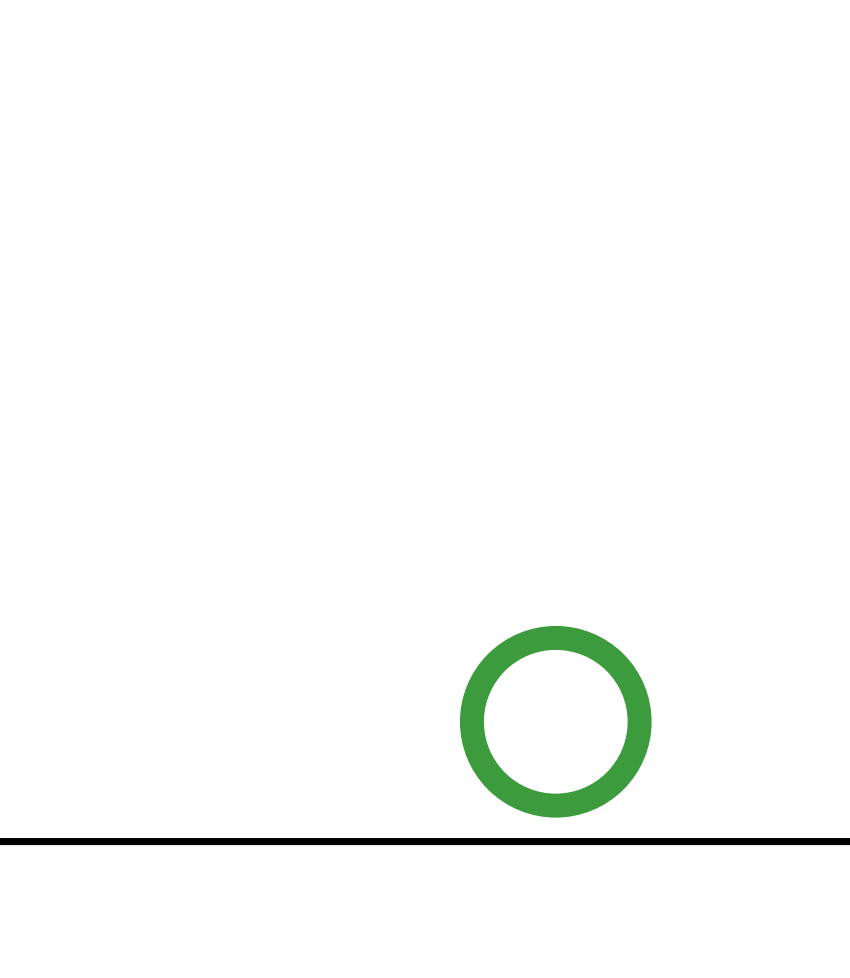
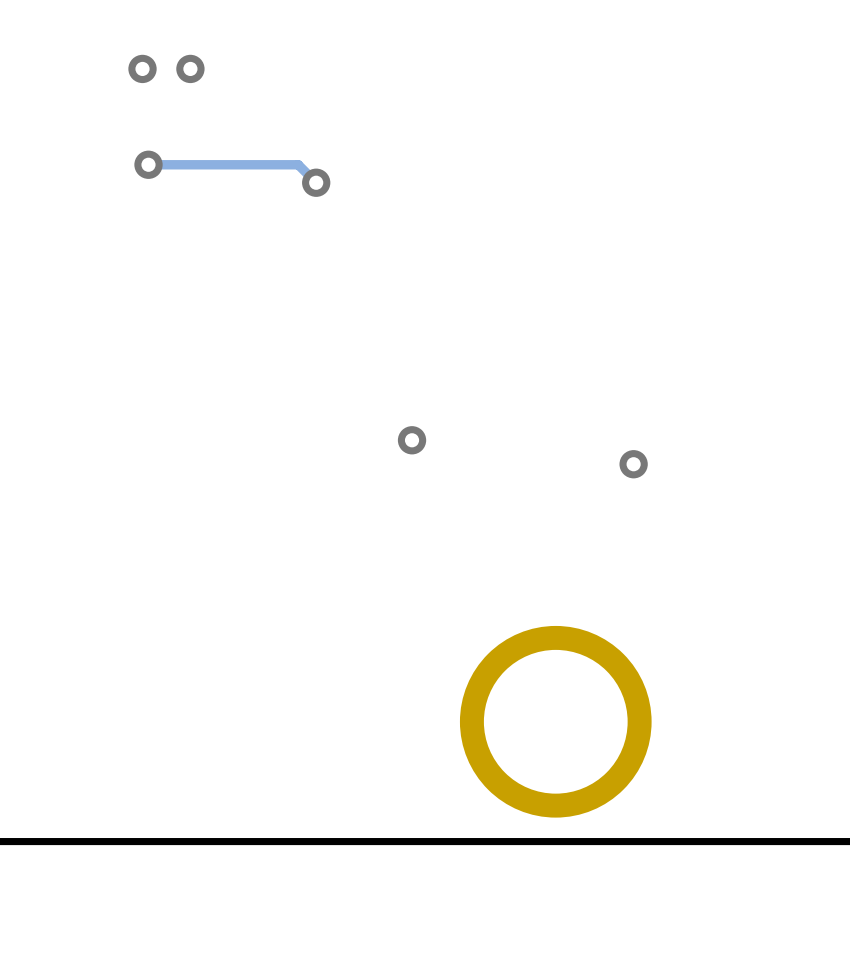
via: none -> (142, 68)
via: none -> (190, 68)
track: none -> (148, 164) (298, 164) (316, 182)
via: none -> (148, 164)
via: none -> (316, 182)
via: none -> (412, 440)
via: none -> (633, 464)

